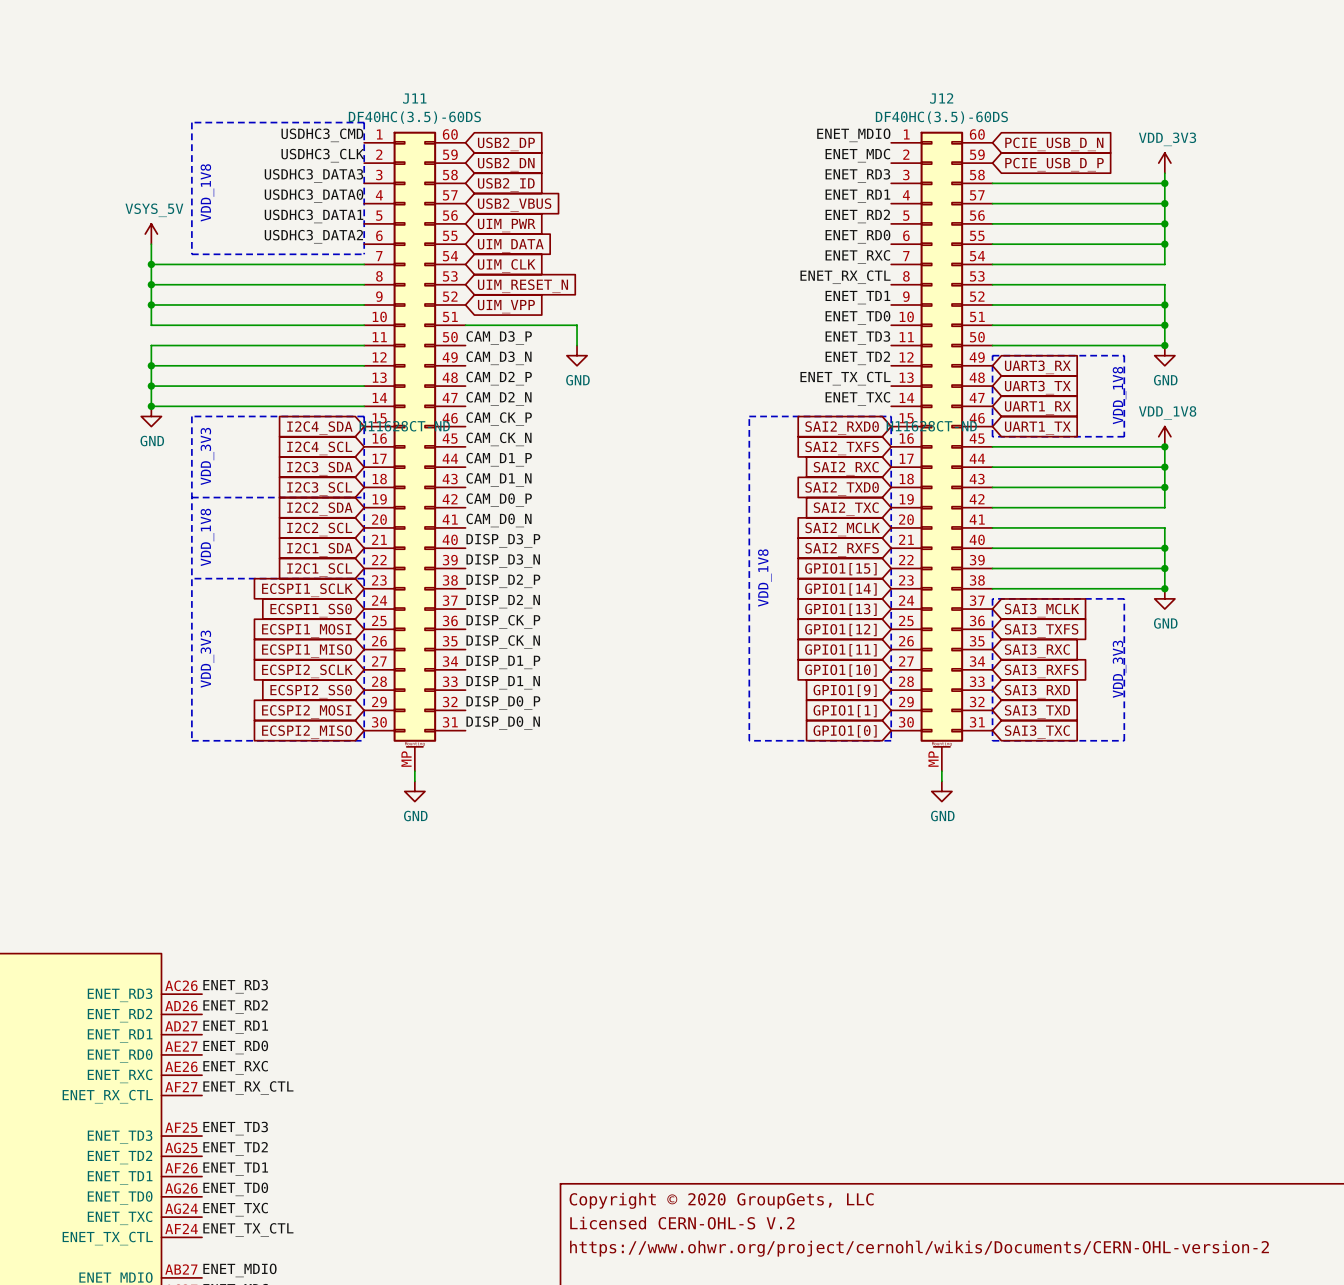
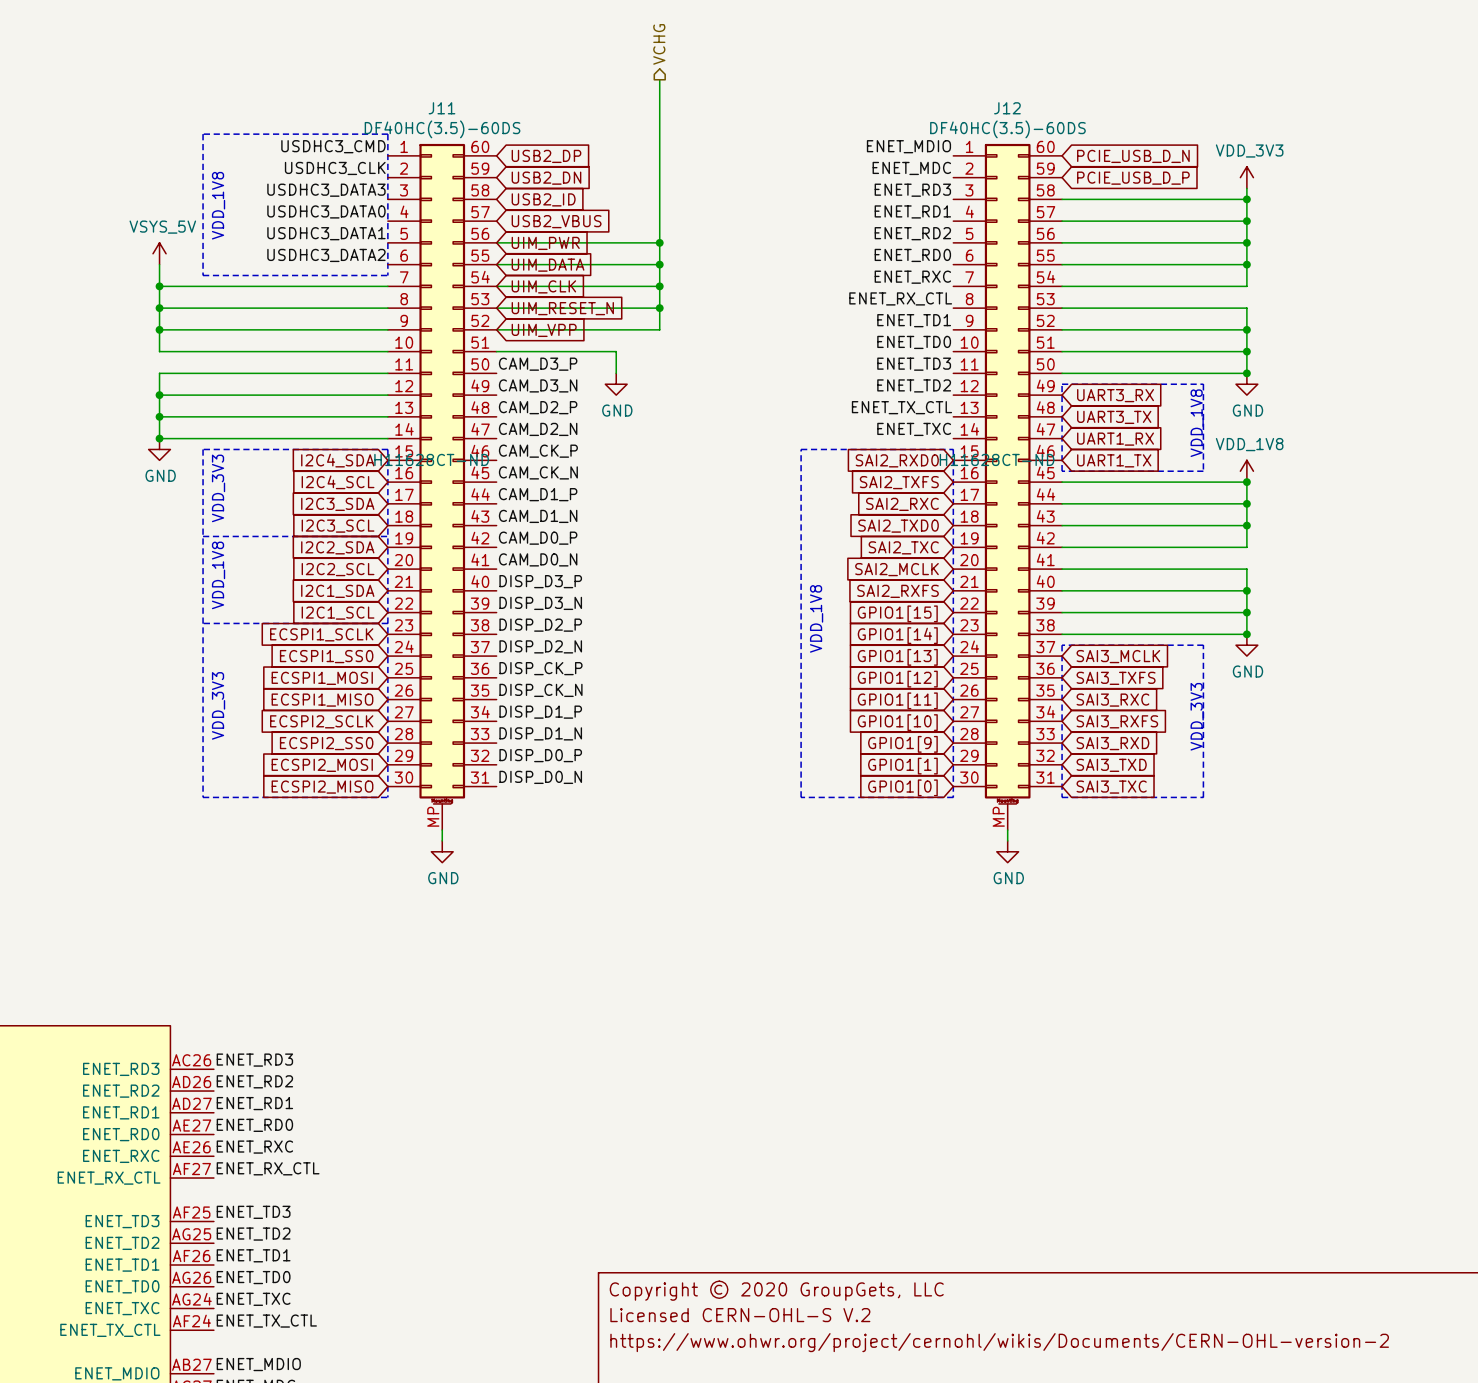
hierarchical label: none -> VCHG (659, 44)
wire: none -> (659, 79) (659, 329) (496, 329)
wire: none -> (496, 242) (659, 242)
junction: none -> (659, 242)
wire: none -> (496, 264) (659, 264)
junction: none -> (659, 264)
wire: none -> (496, 286) (659, 286)
junction: none -> (659, 286)
wire: none -> (496, 308) (659, 308)
junction: none -> (659, 308)

